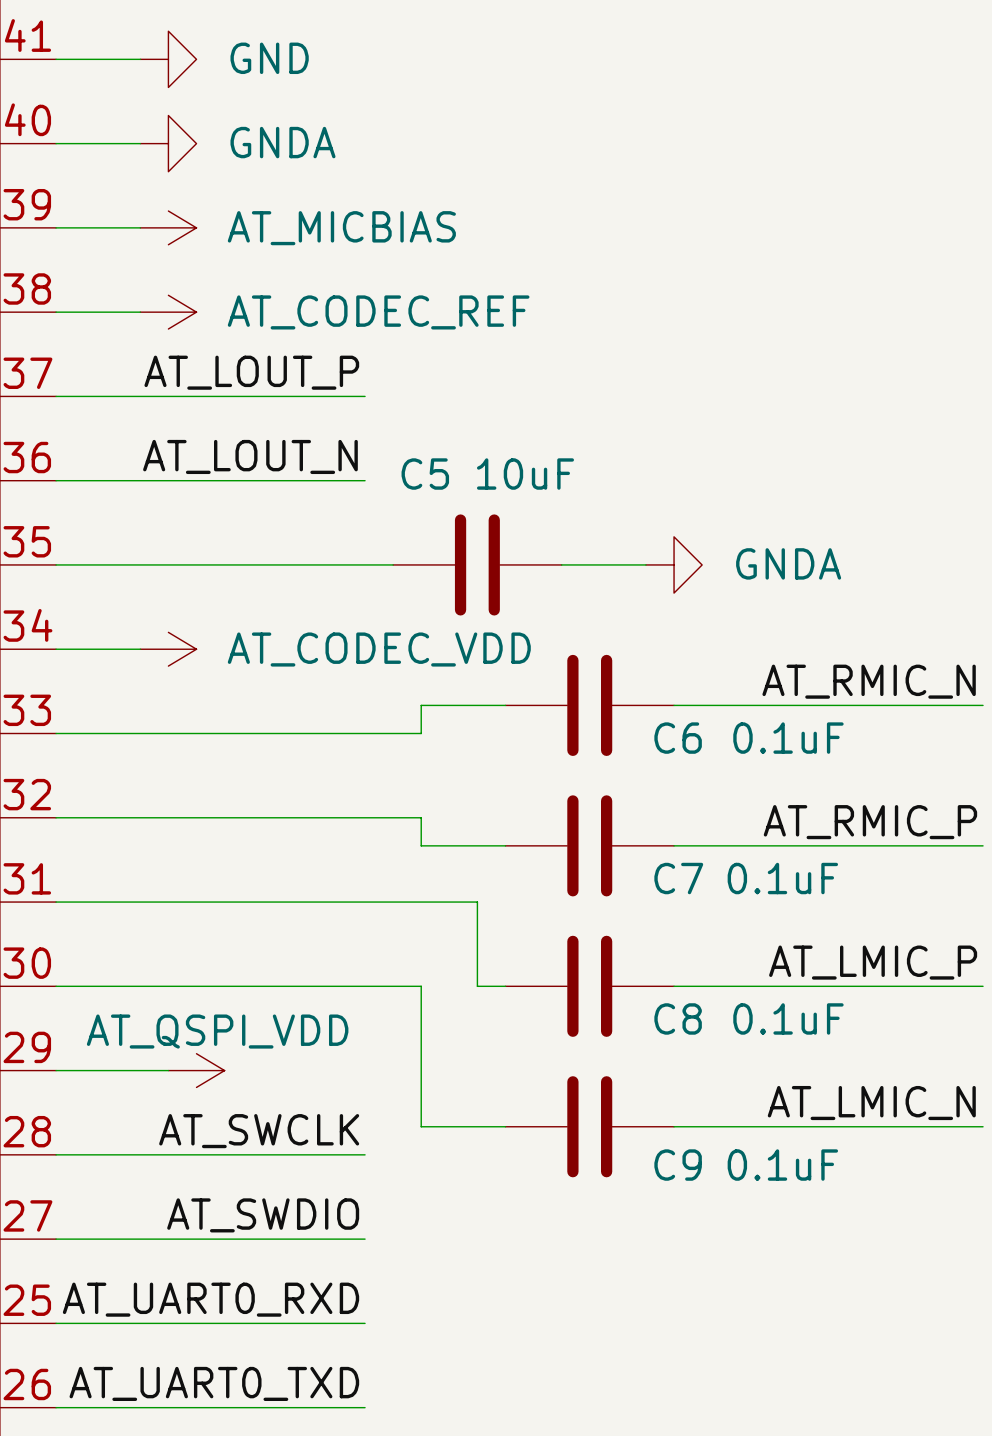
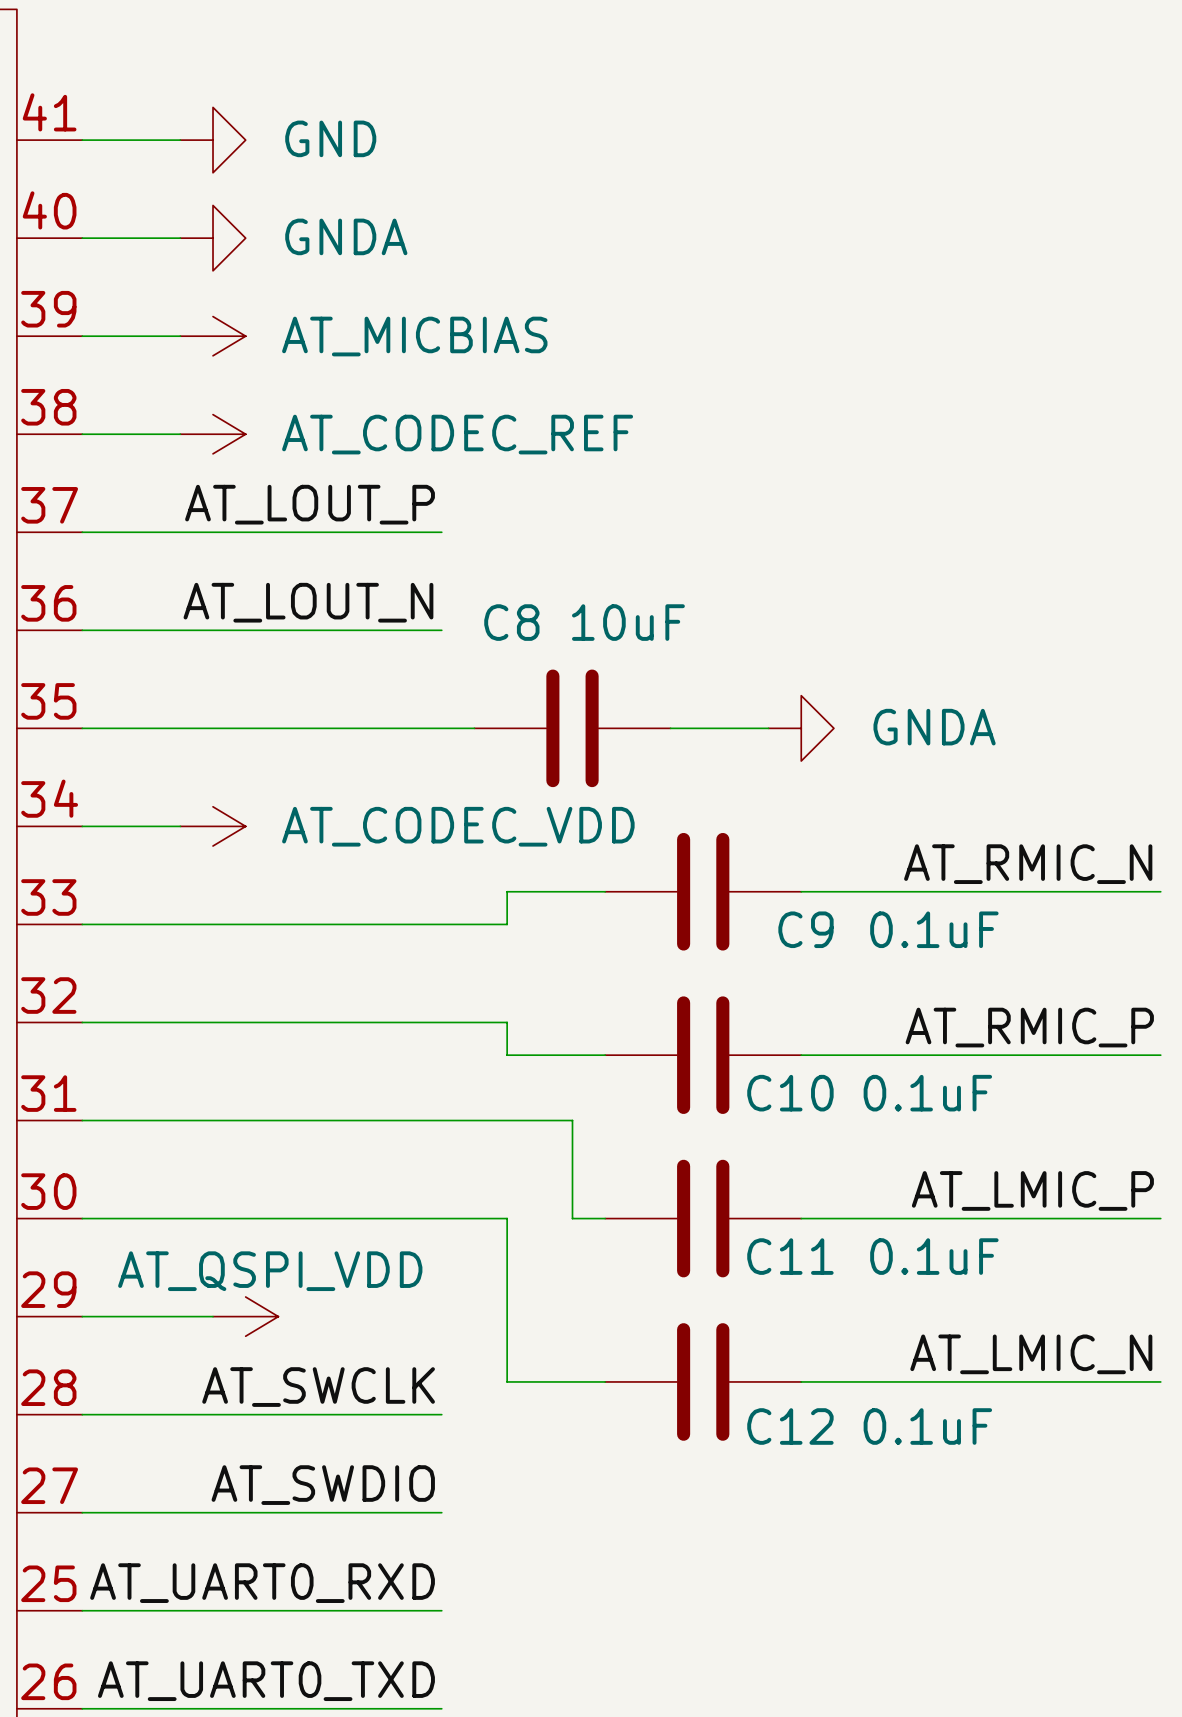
C5 name: C5 (425, 474) -> C8 (511, 622)
C6 name: C6 (678, 738) -> C9 (805, 929)
C7 name: C7 (678, 878) -> C10 (790, 1093)
C8 name: C8 (678, 1018) -> C11 (790, 1256)
C9 name: C9 (678, 1165) -> C12 (790, 1426)

